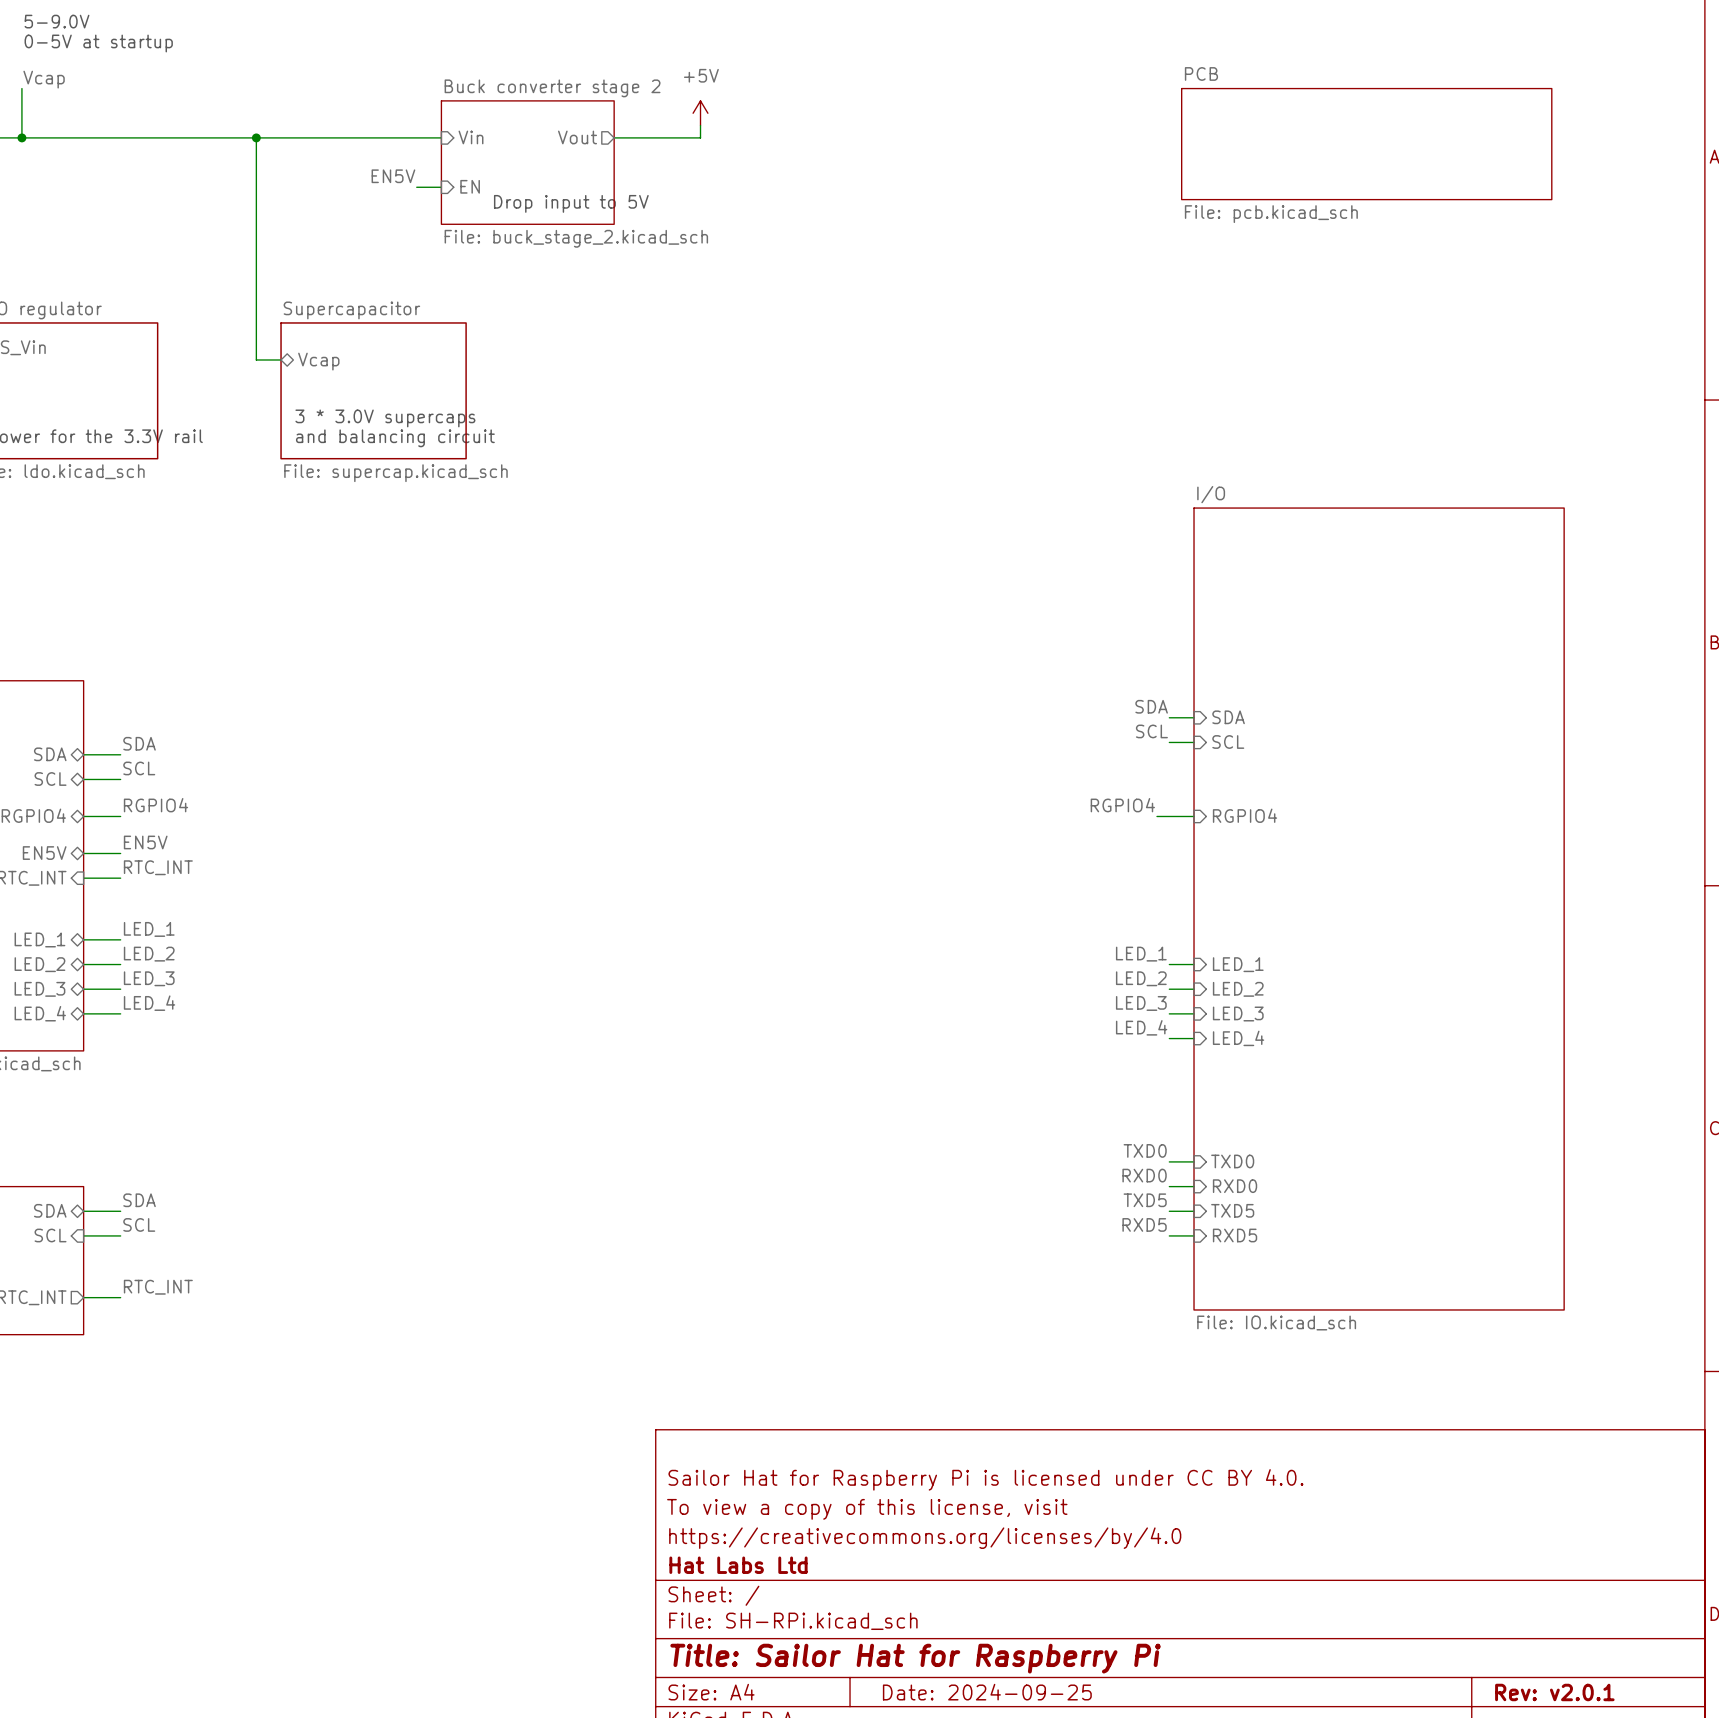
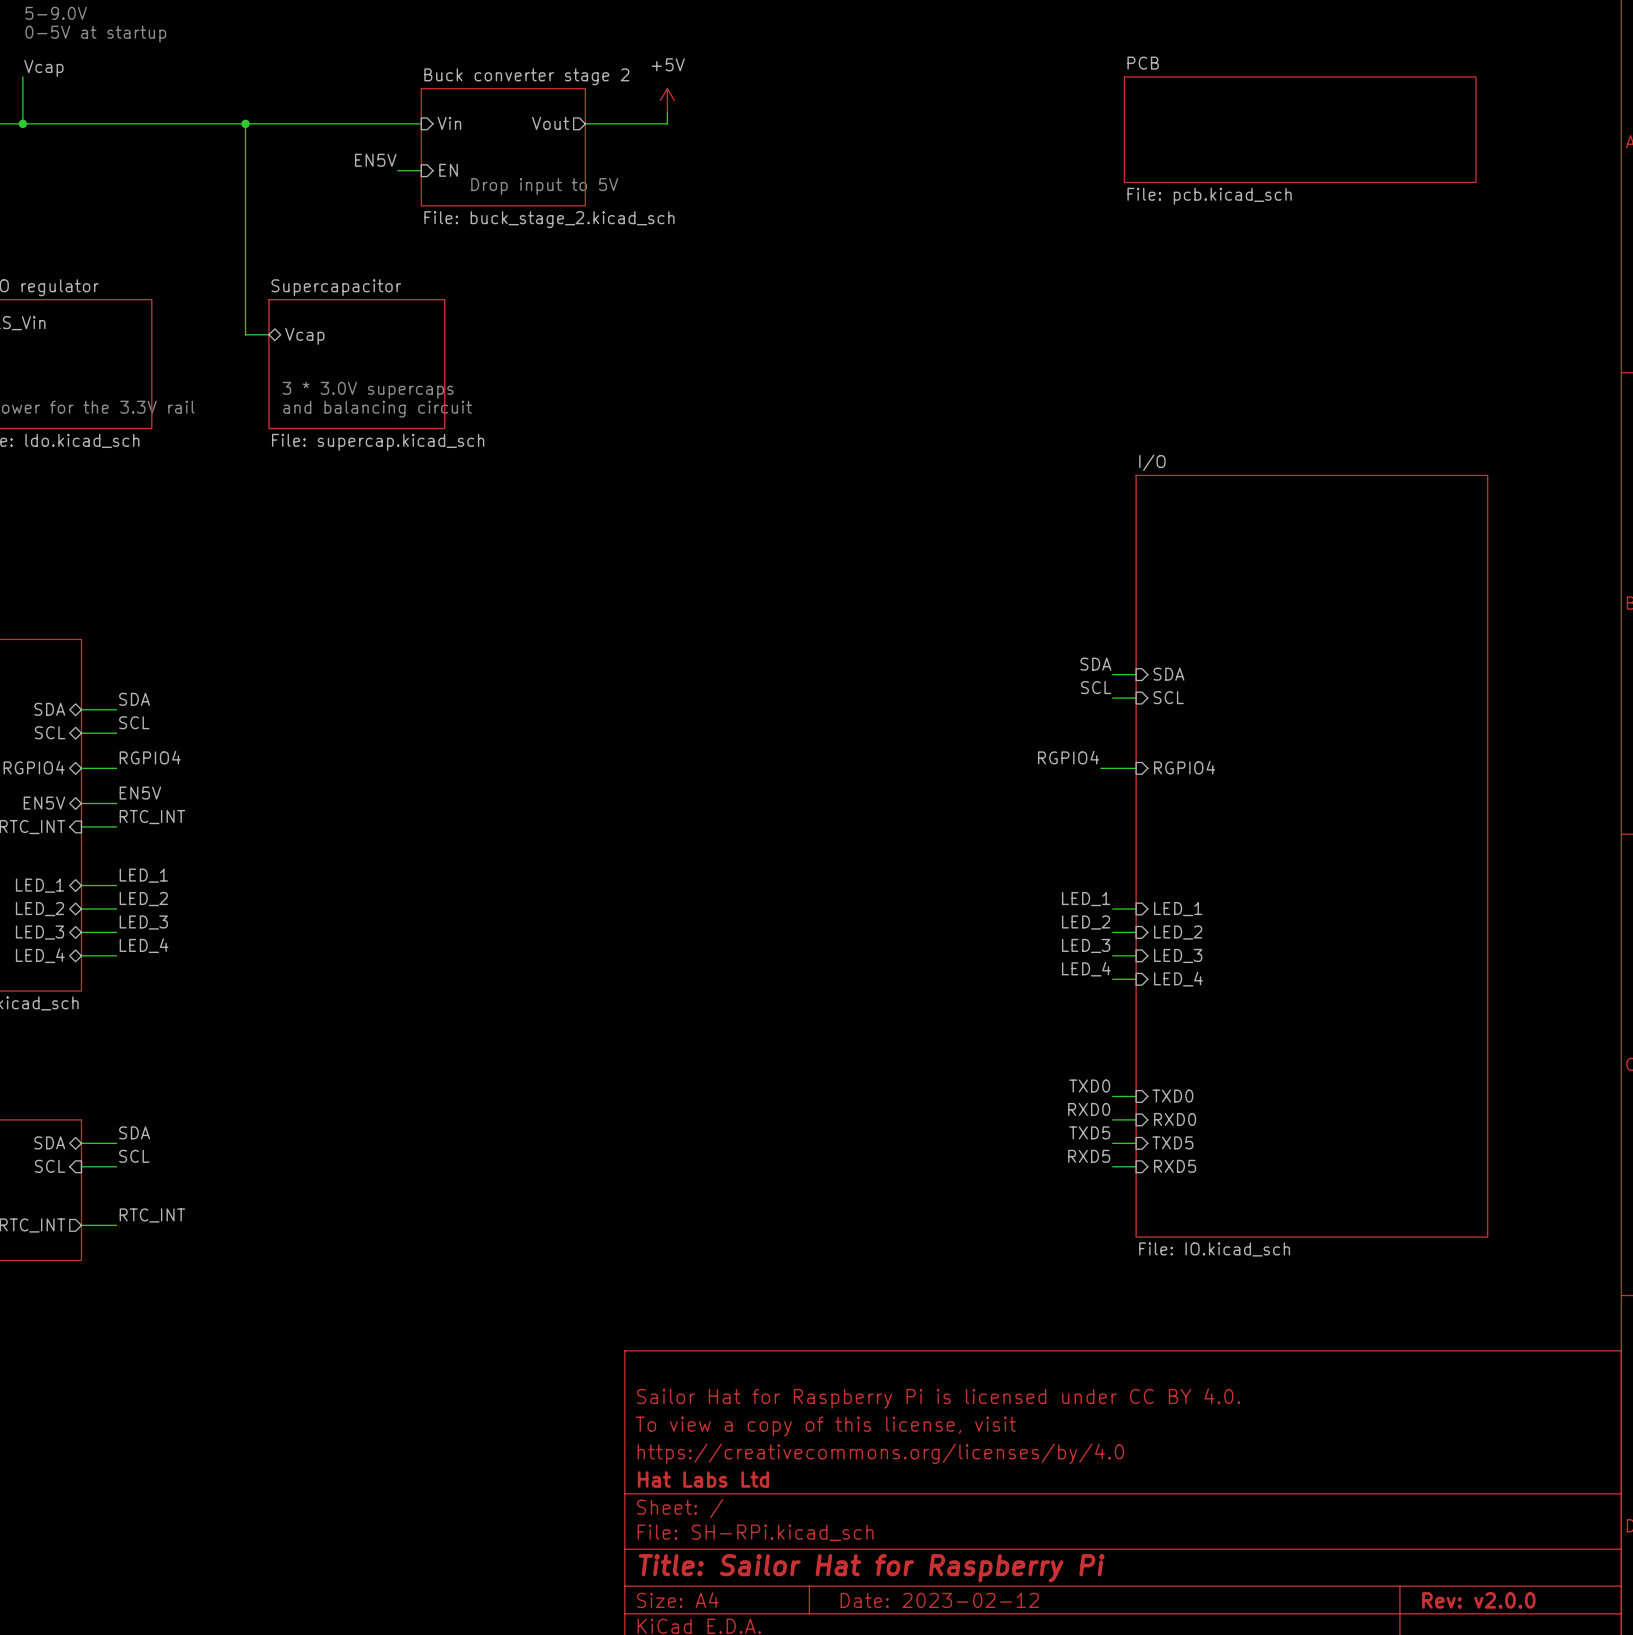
title block: Date: 2024-09-25 (987, 1692) -> Date: 2023-02-12 (939, 1600)
title block: Rev: v2.0.1 (1554, 1692) -> Rev: v2.0.0 (1478, 1600)

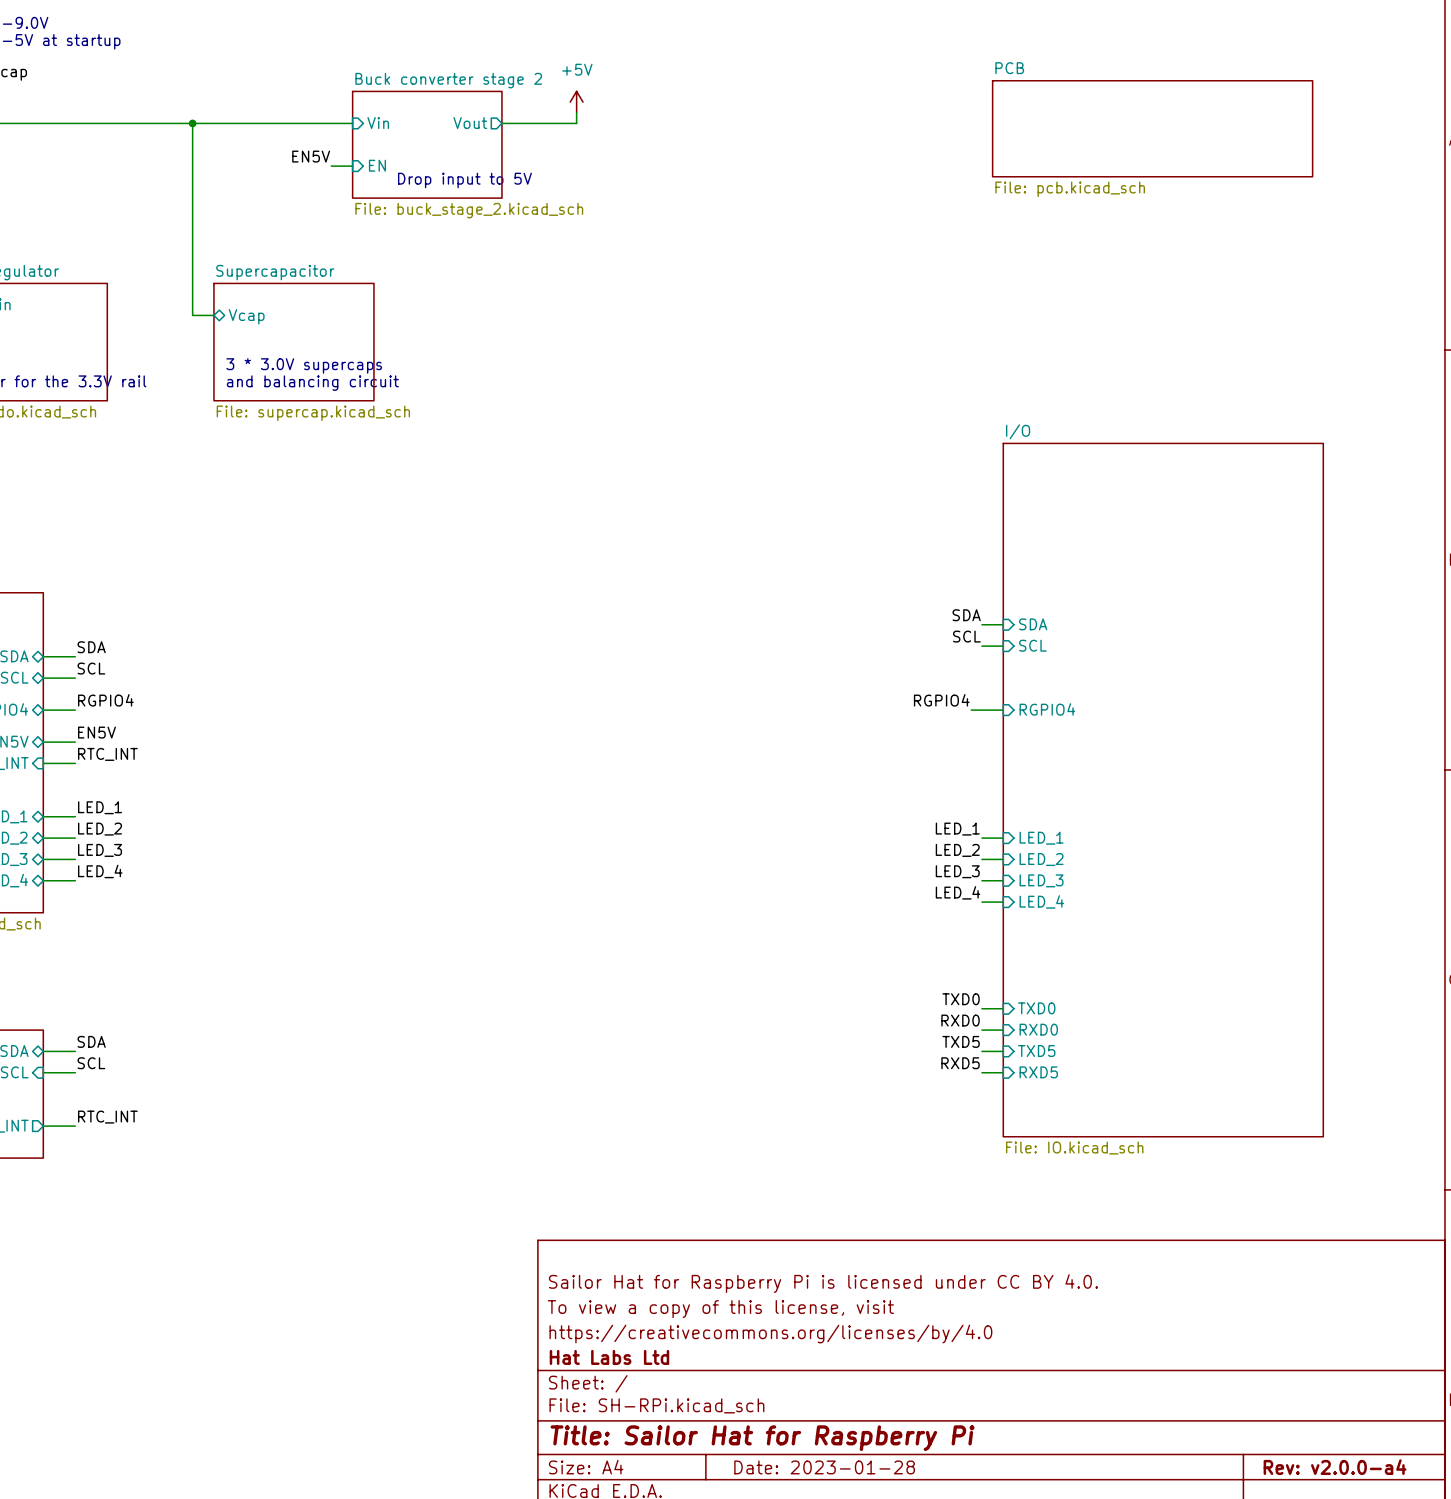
title block: Date: 2023-02-12 (939, 1600) -> Date: 2023-01-28 (824, 1467)
title block: Rev: v2.0.0 (1478, 1600) -> Rev: v2.0.0-a4 (1335, 1467)

